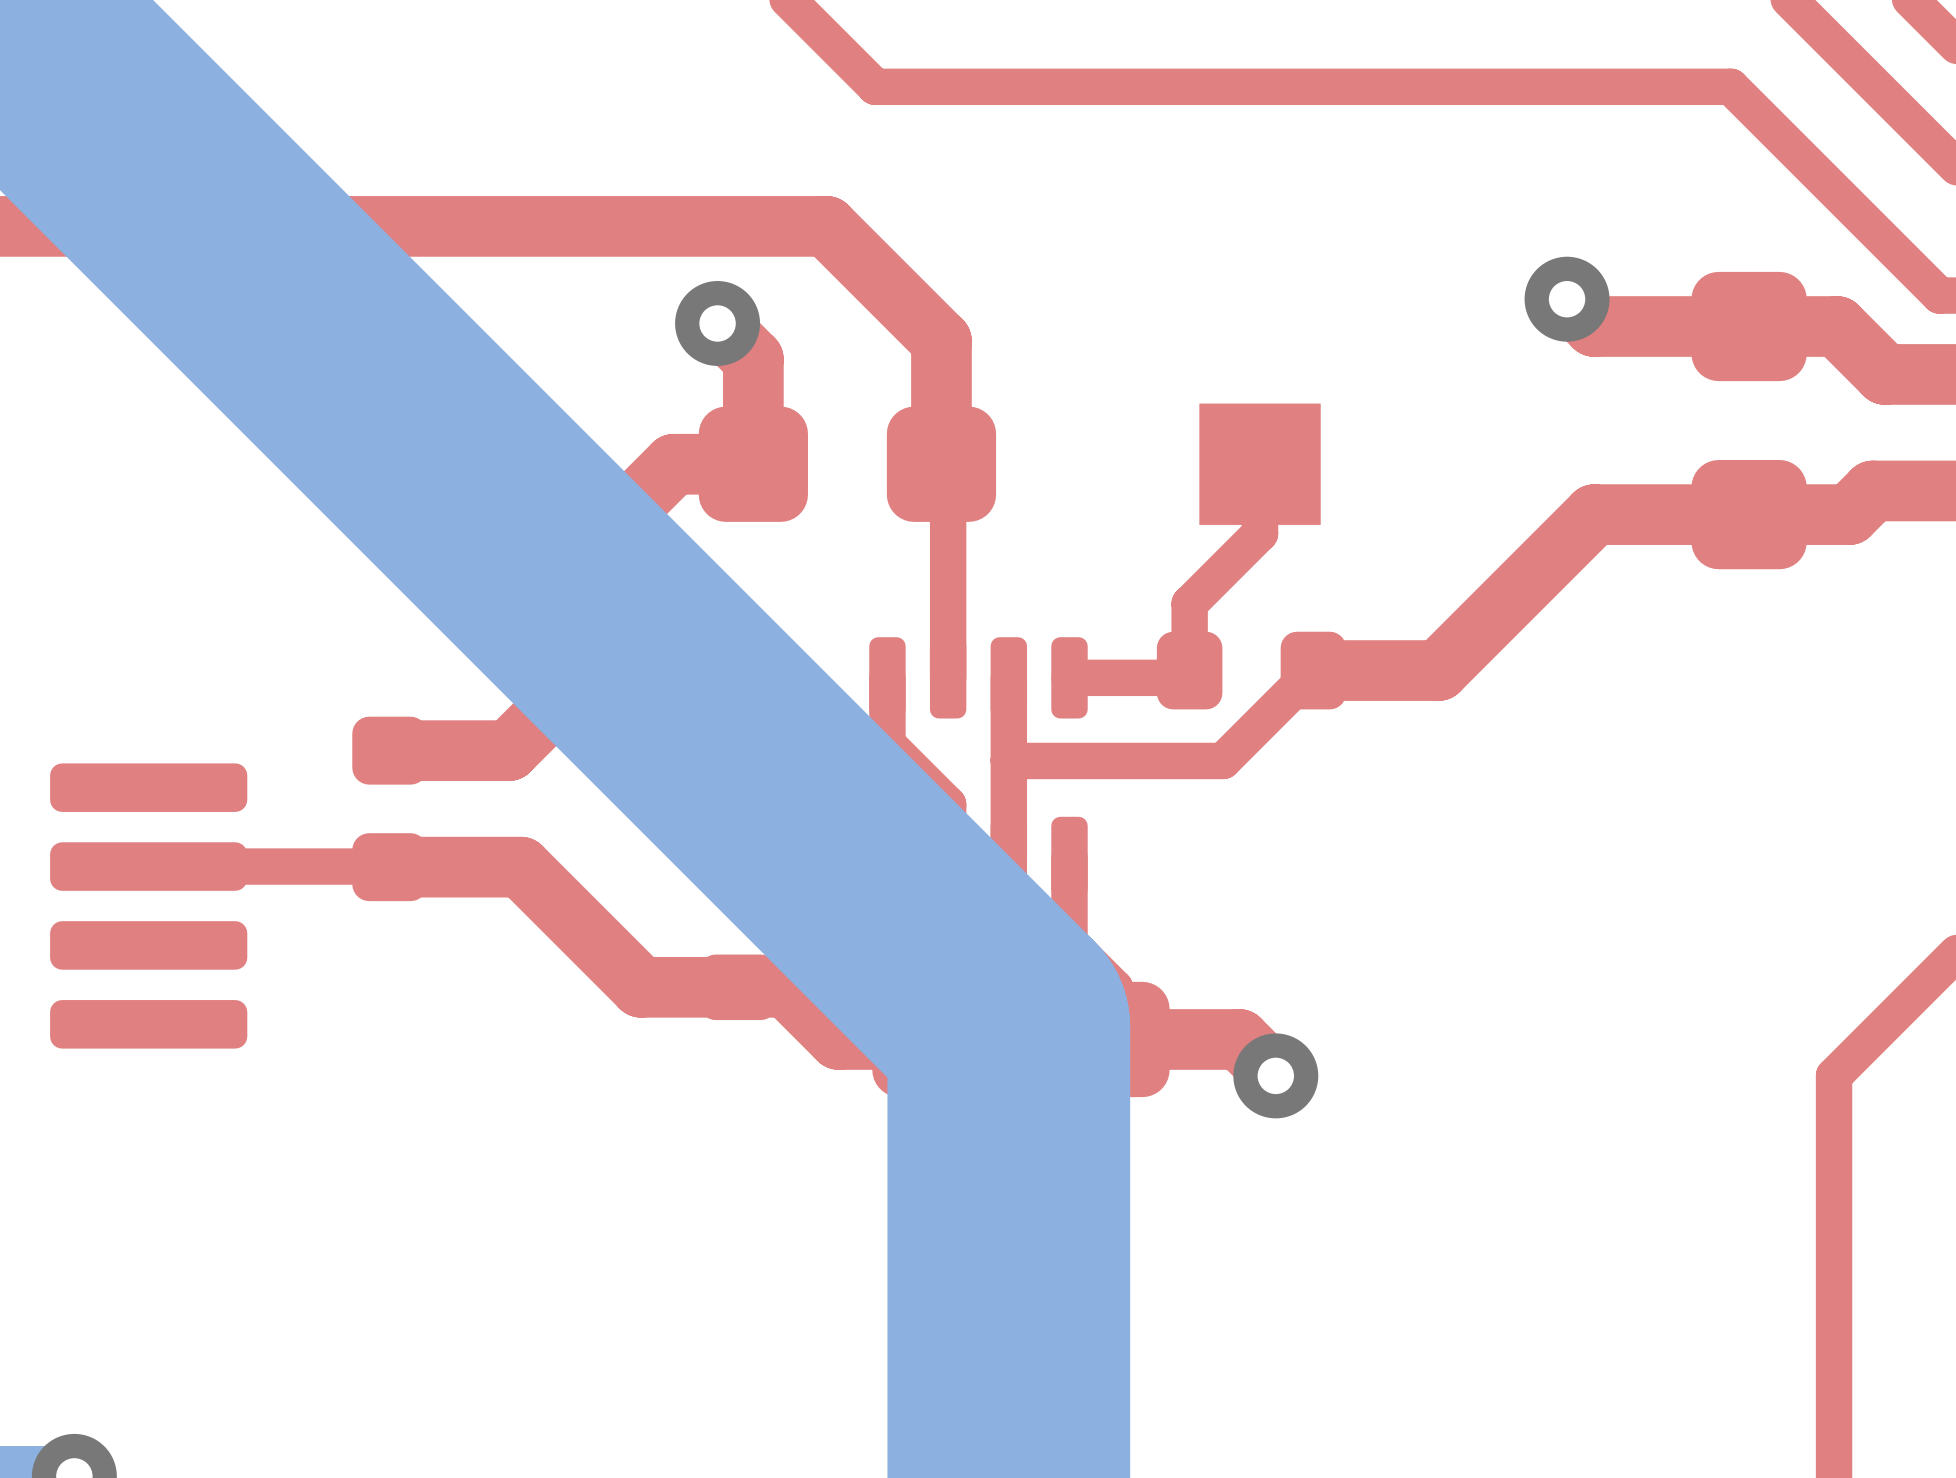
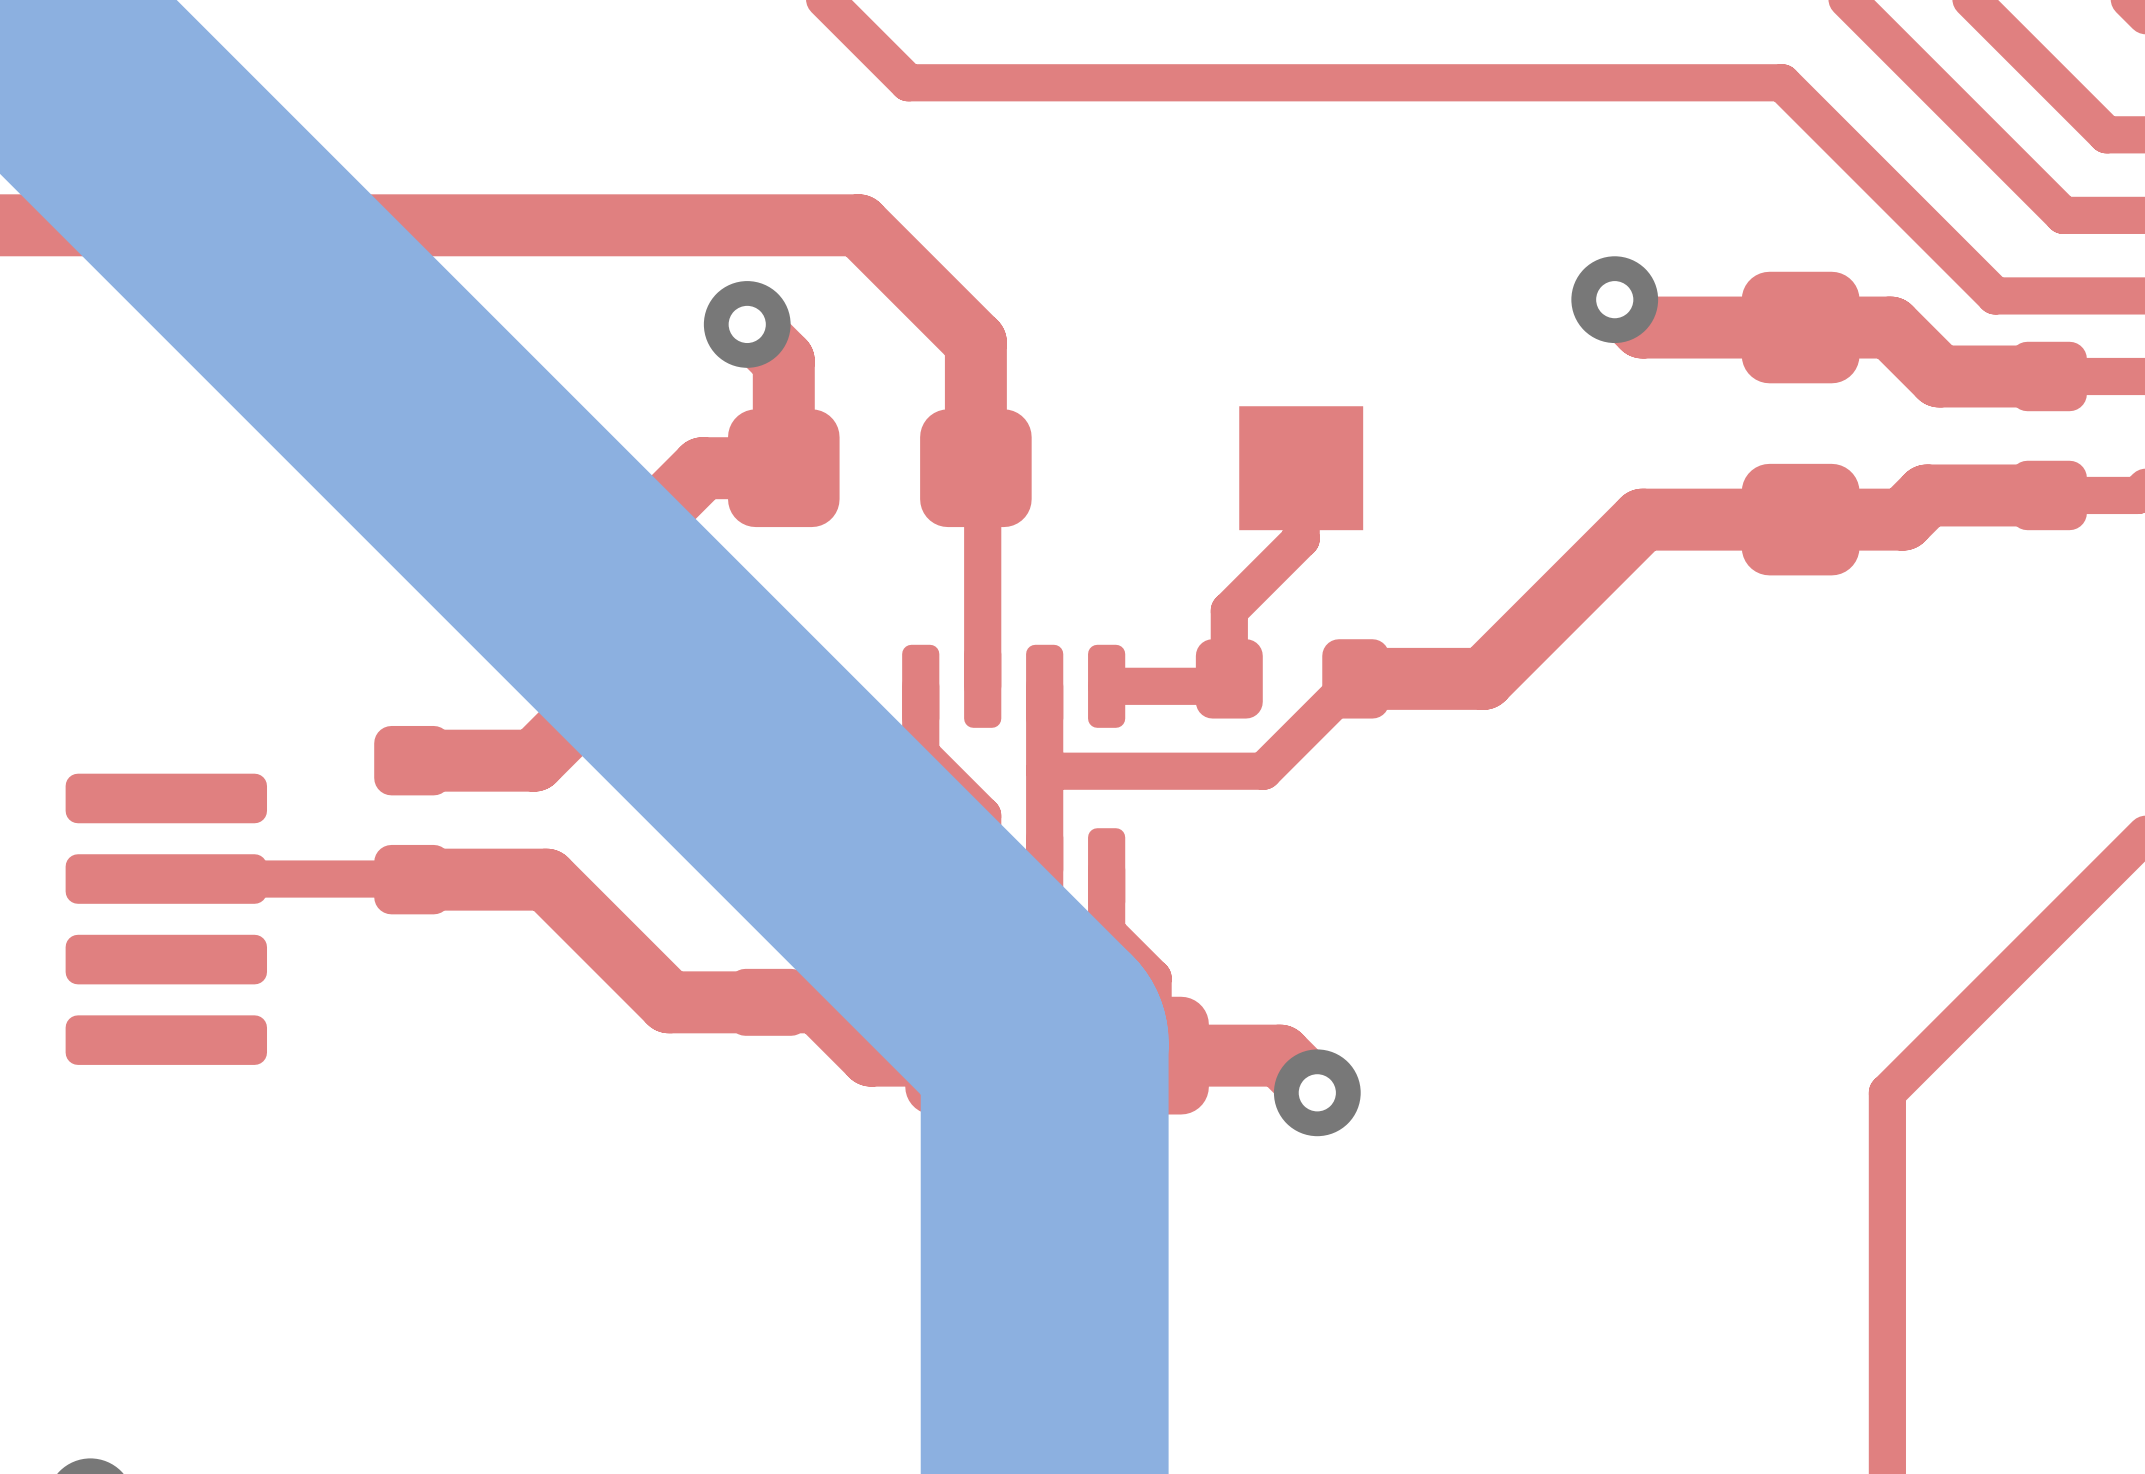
top track: (1069, 918) (1069, 942) (1115, 987) -> (1106, 931) (1153, 978) (1153, 1002)

